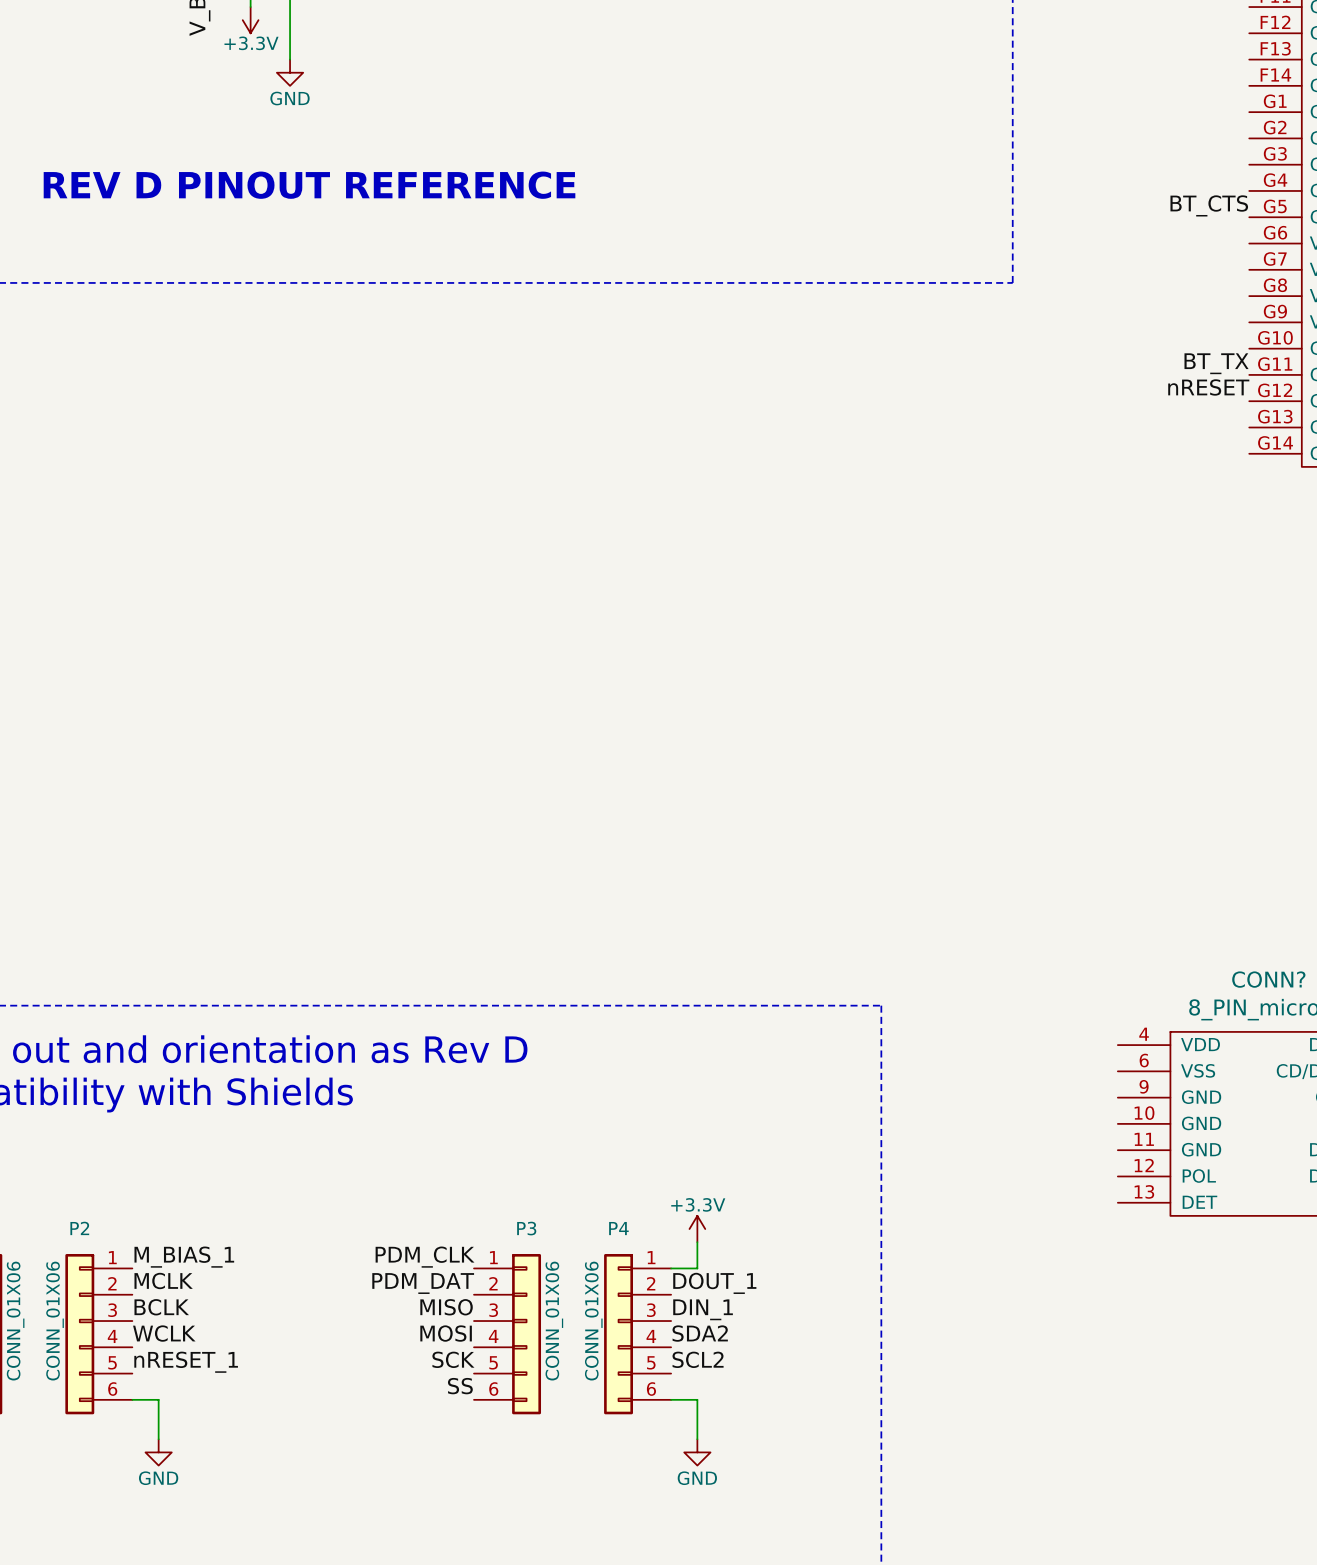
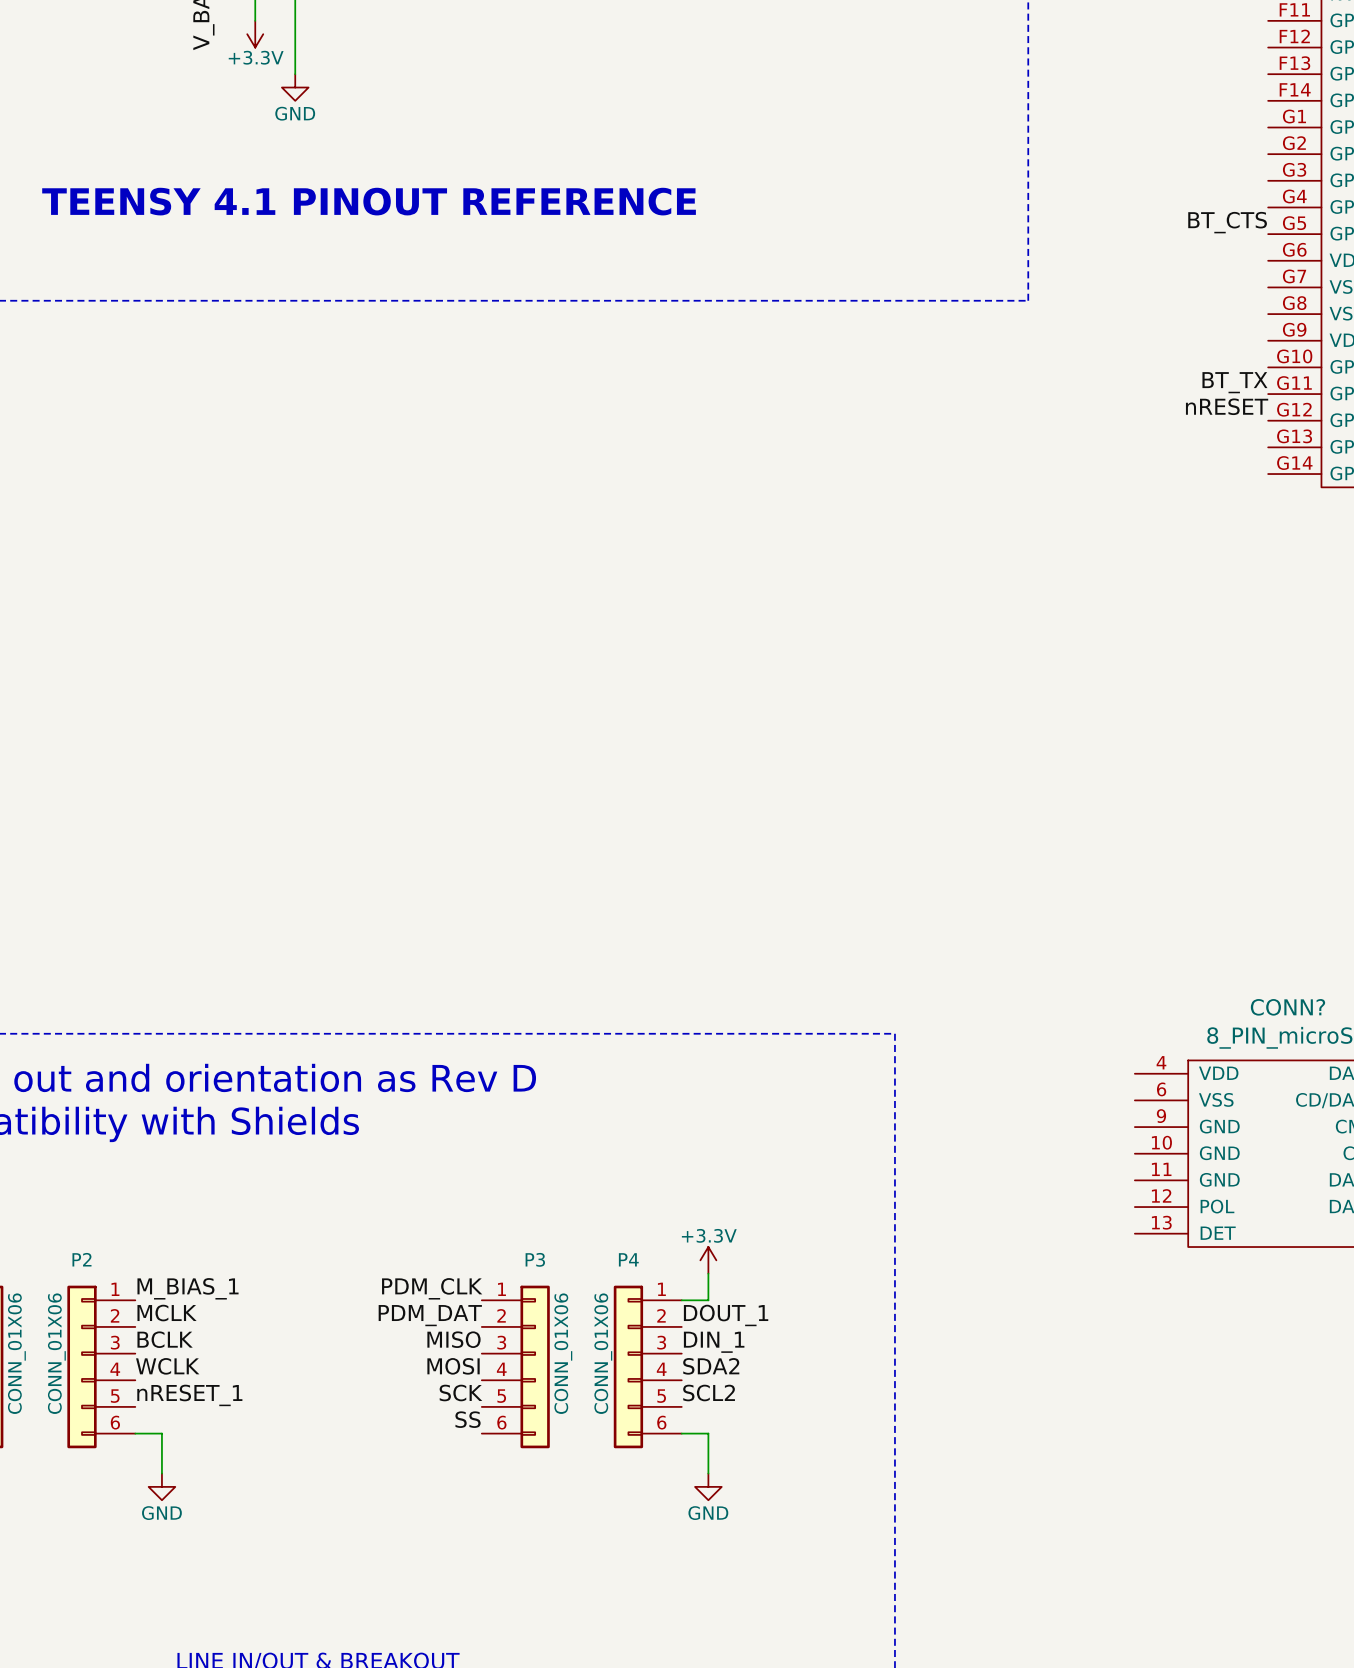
text: REV D PINOUT REFERENCE (309, 185) -> TEENSY 4.1 PINOUT REFERENCE (369, 201)

